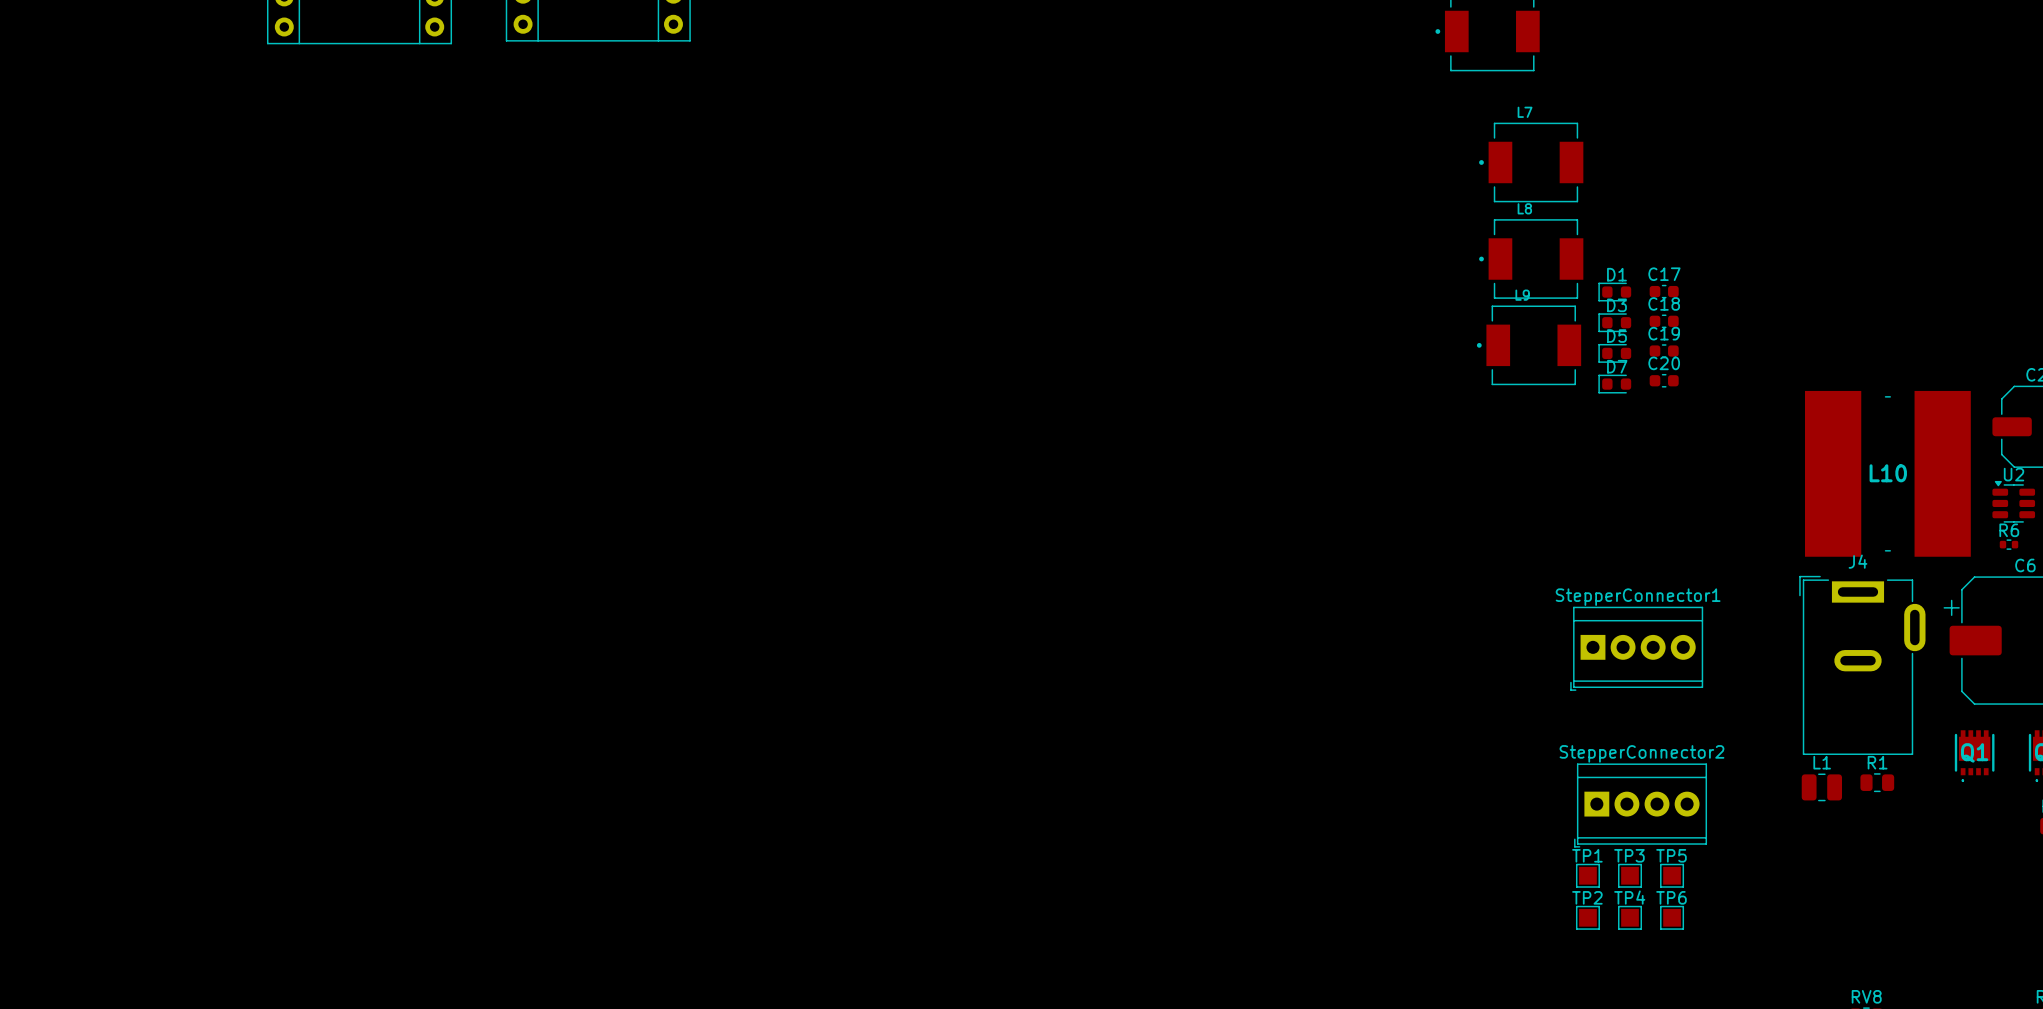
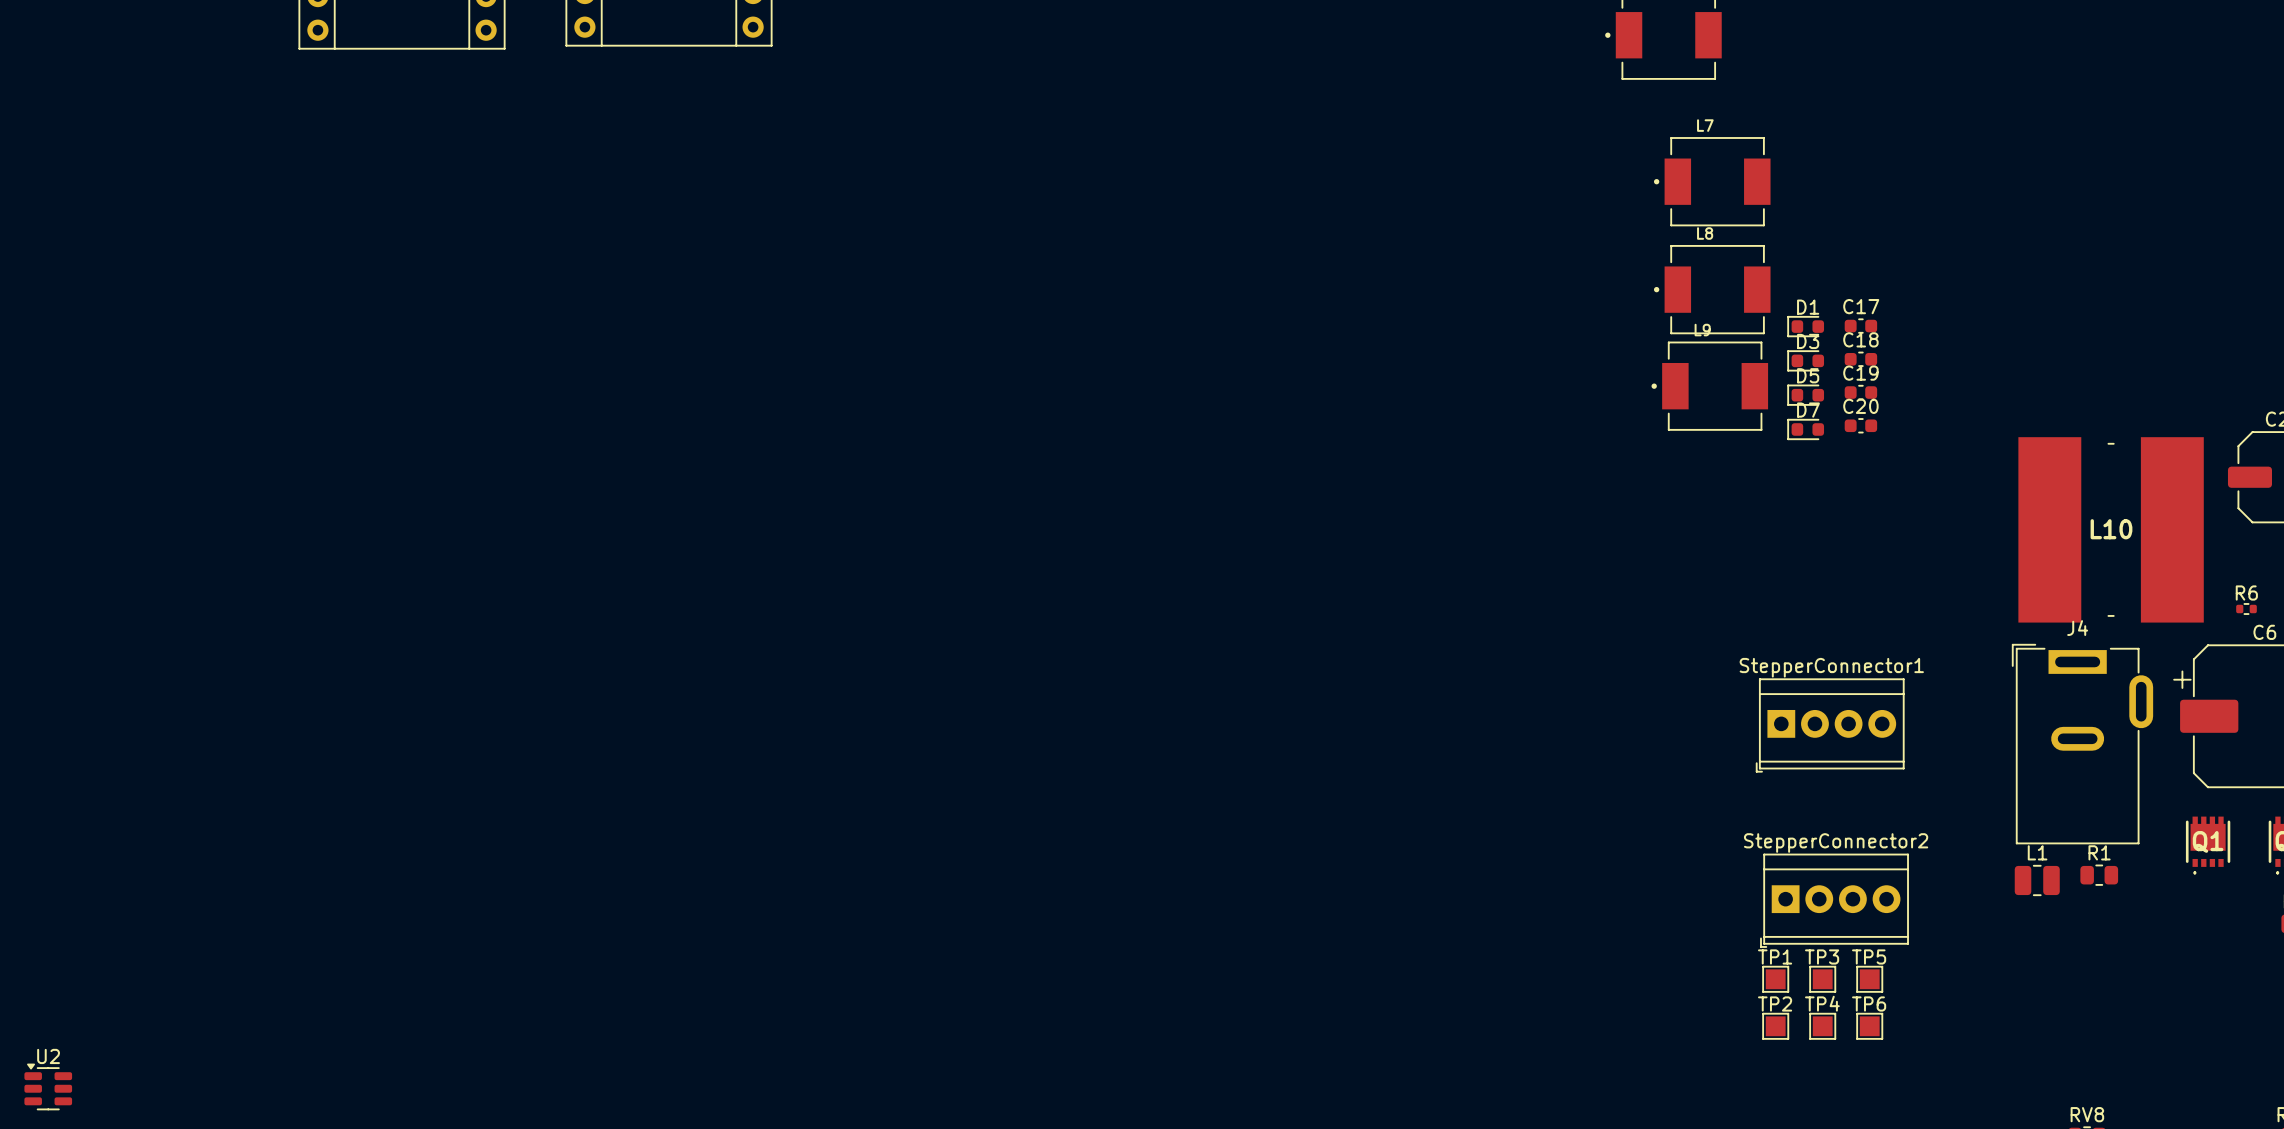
U2 position: (2013, 501) -> (48, 1086)

